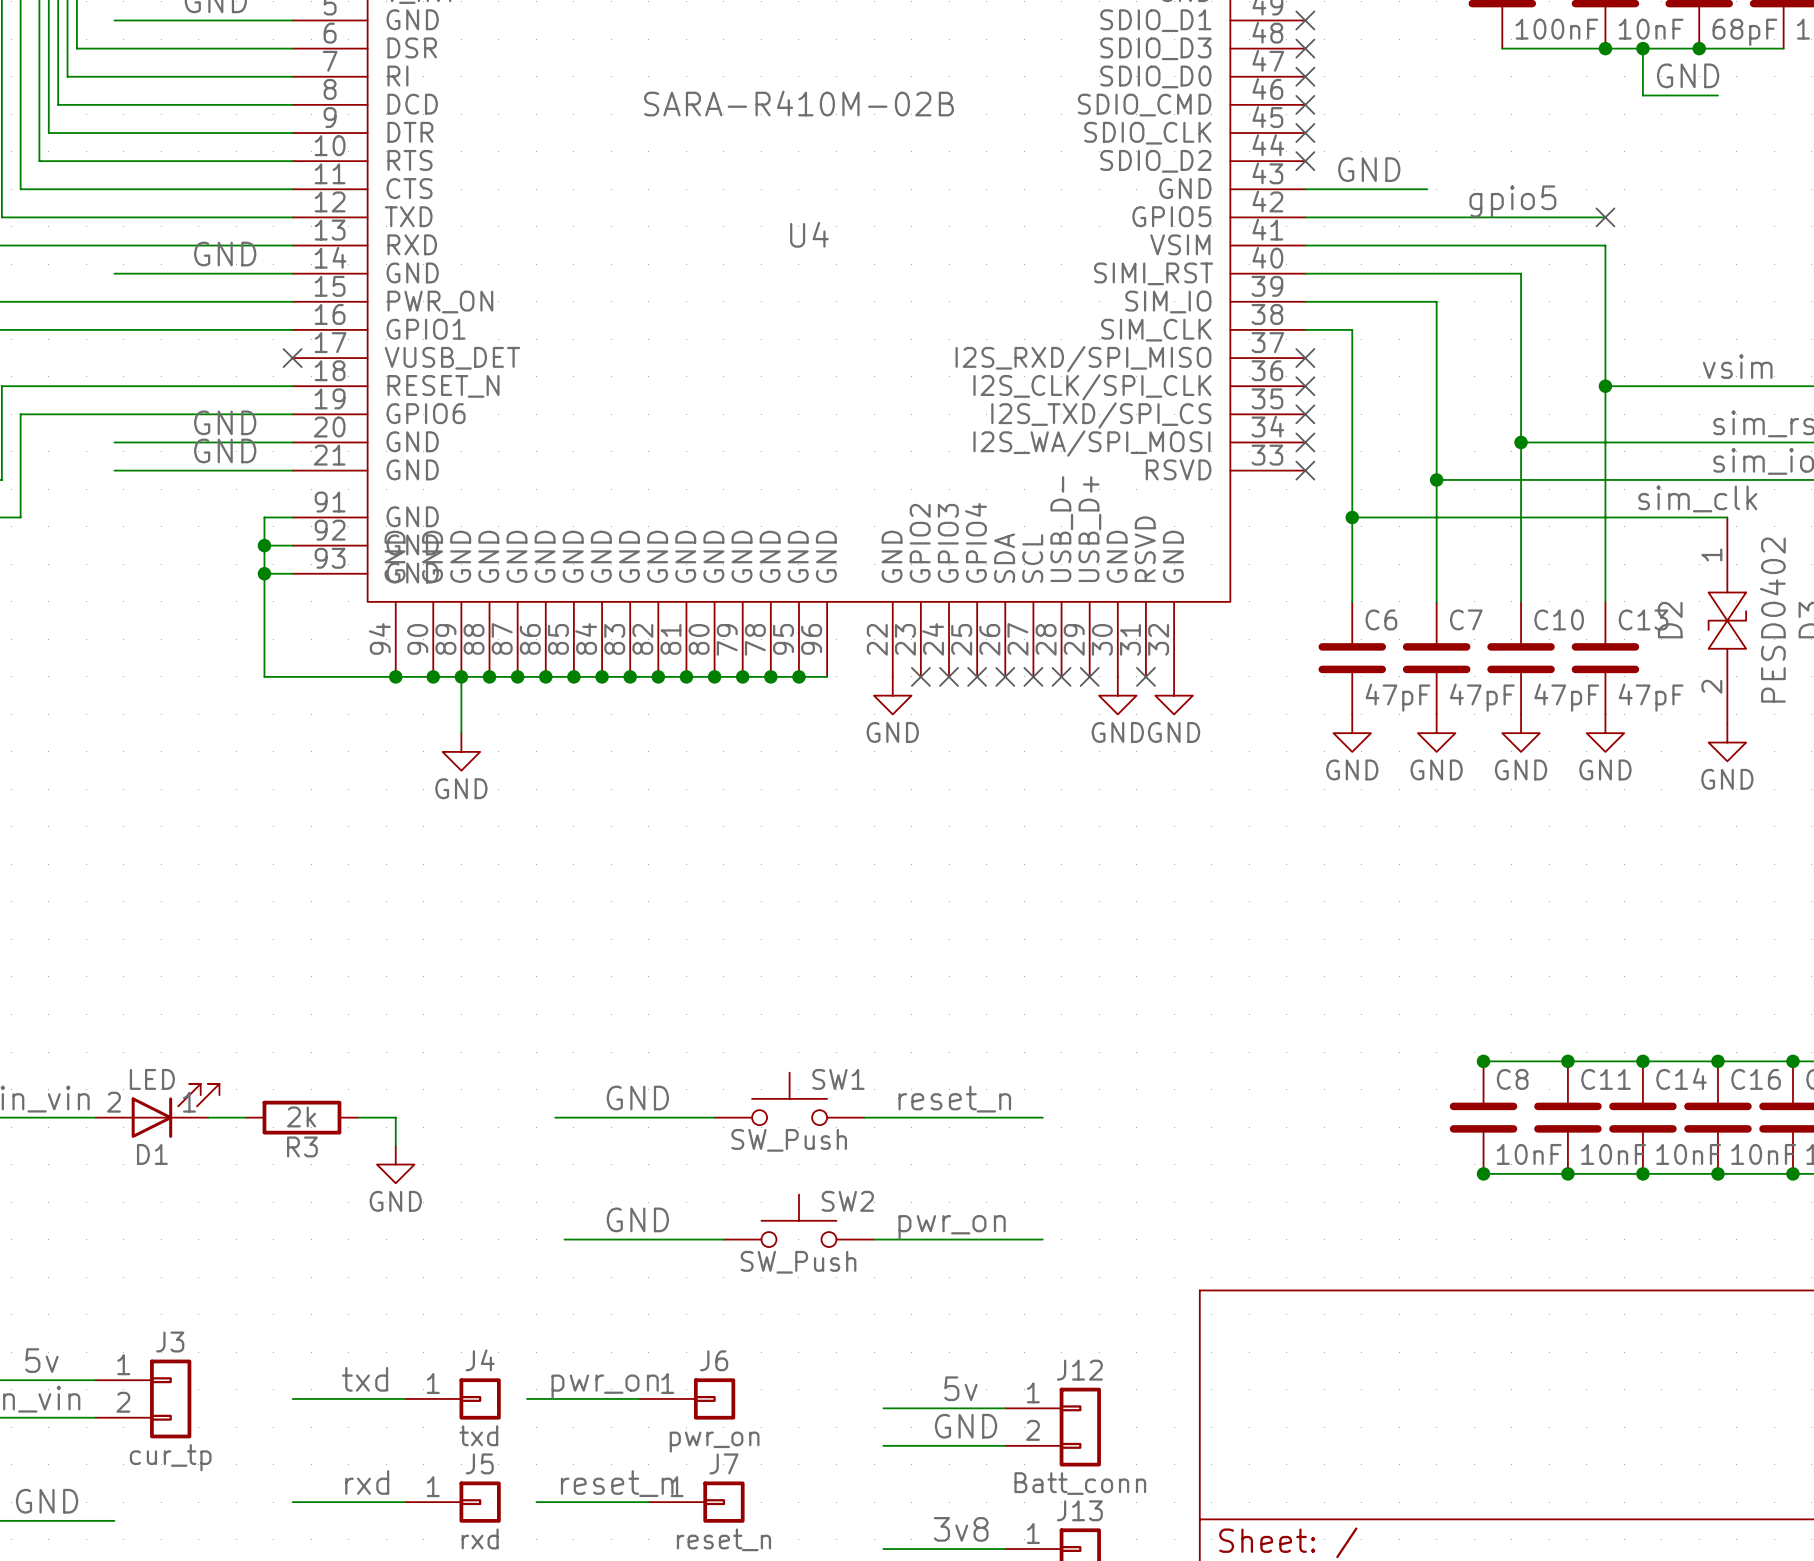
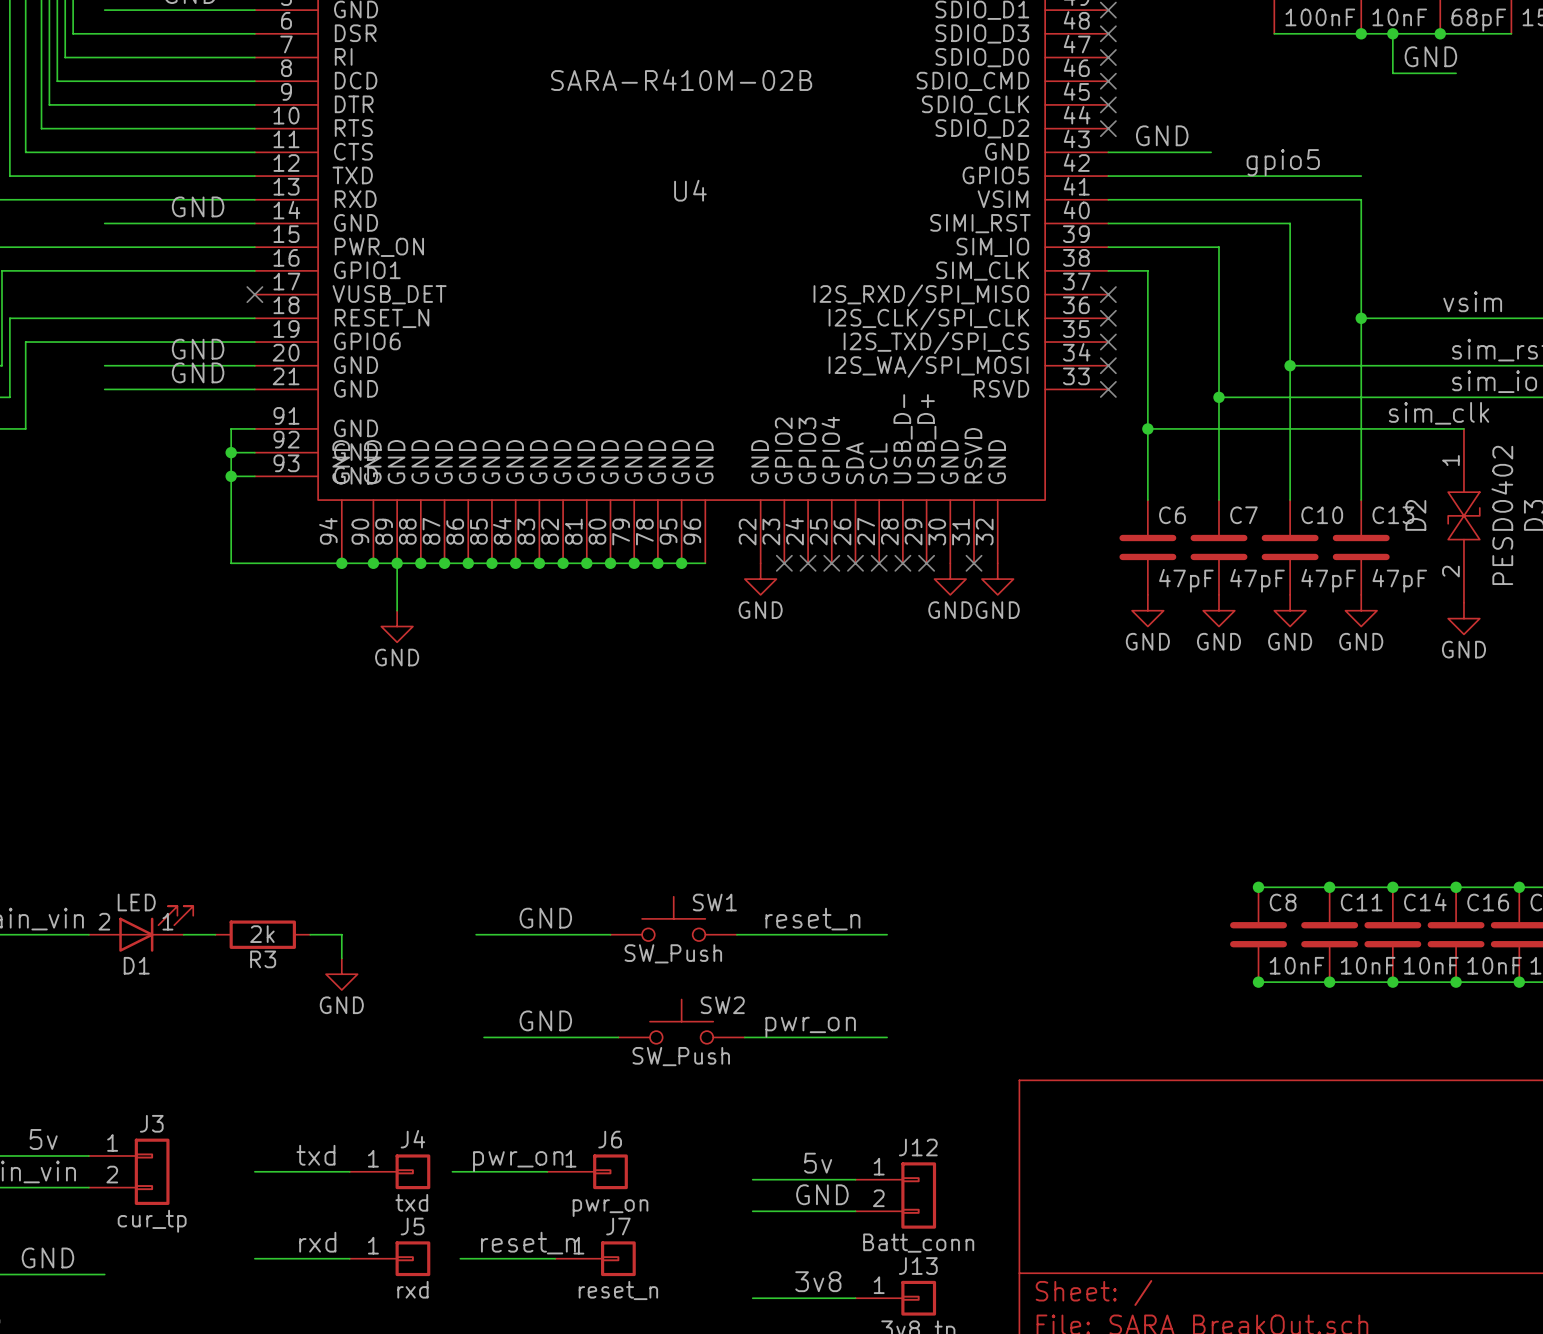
no-connect mark: (1605, 217) -> none

